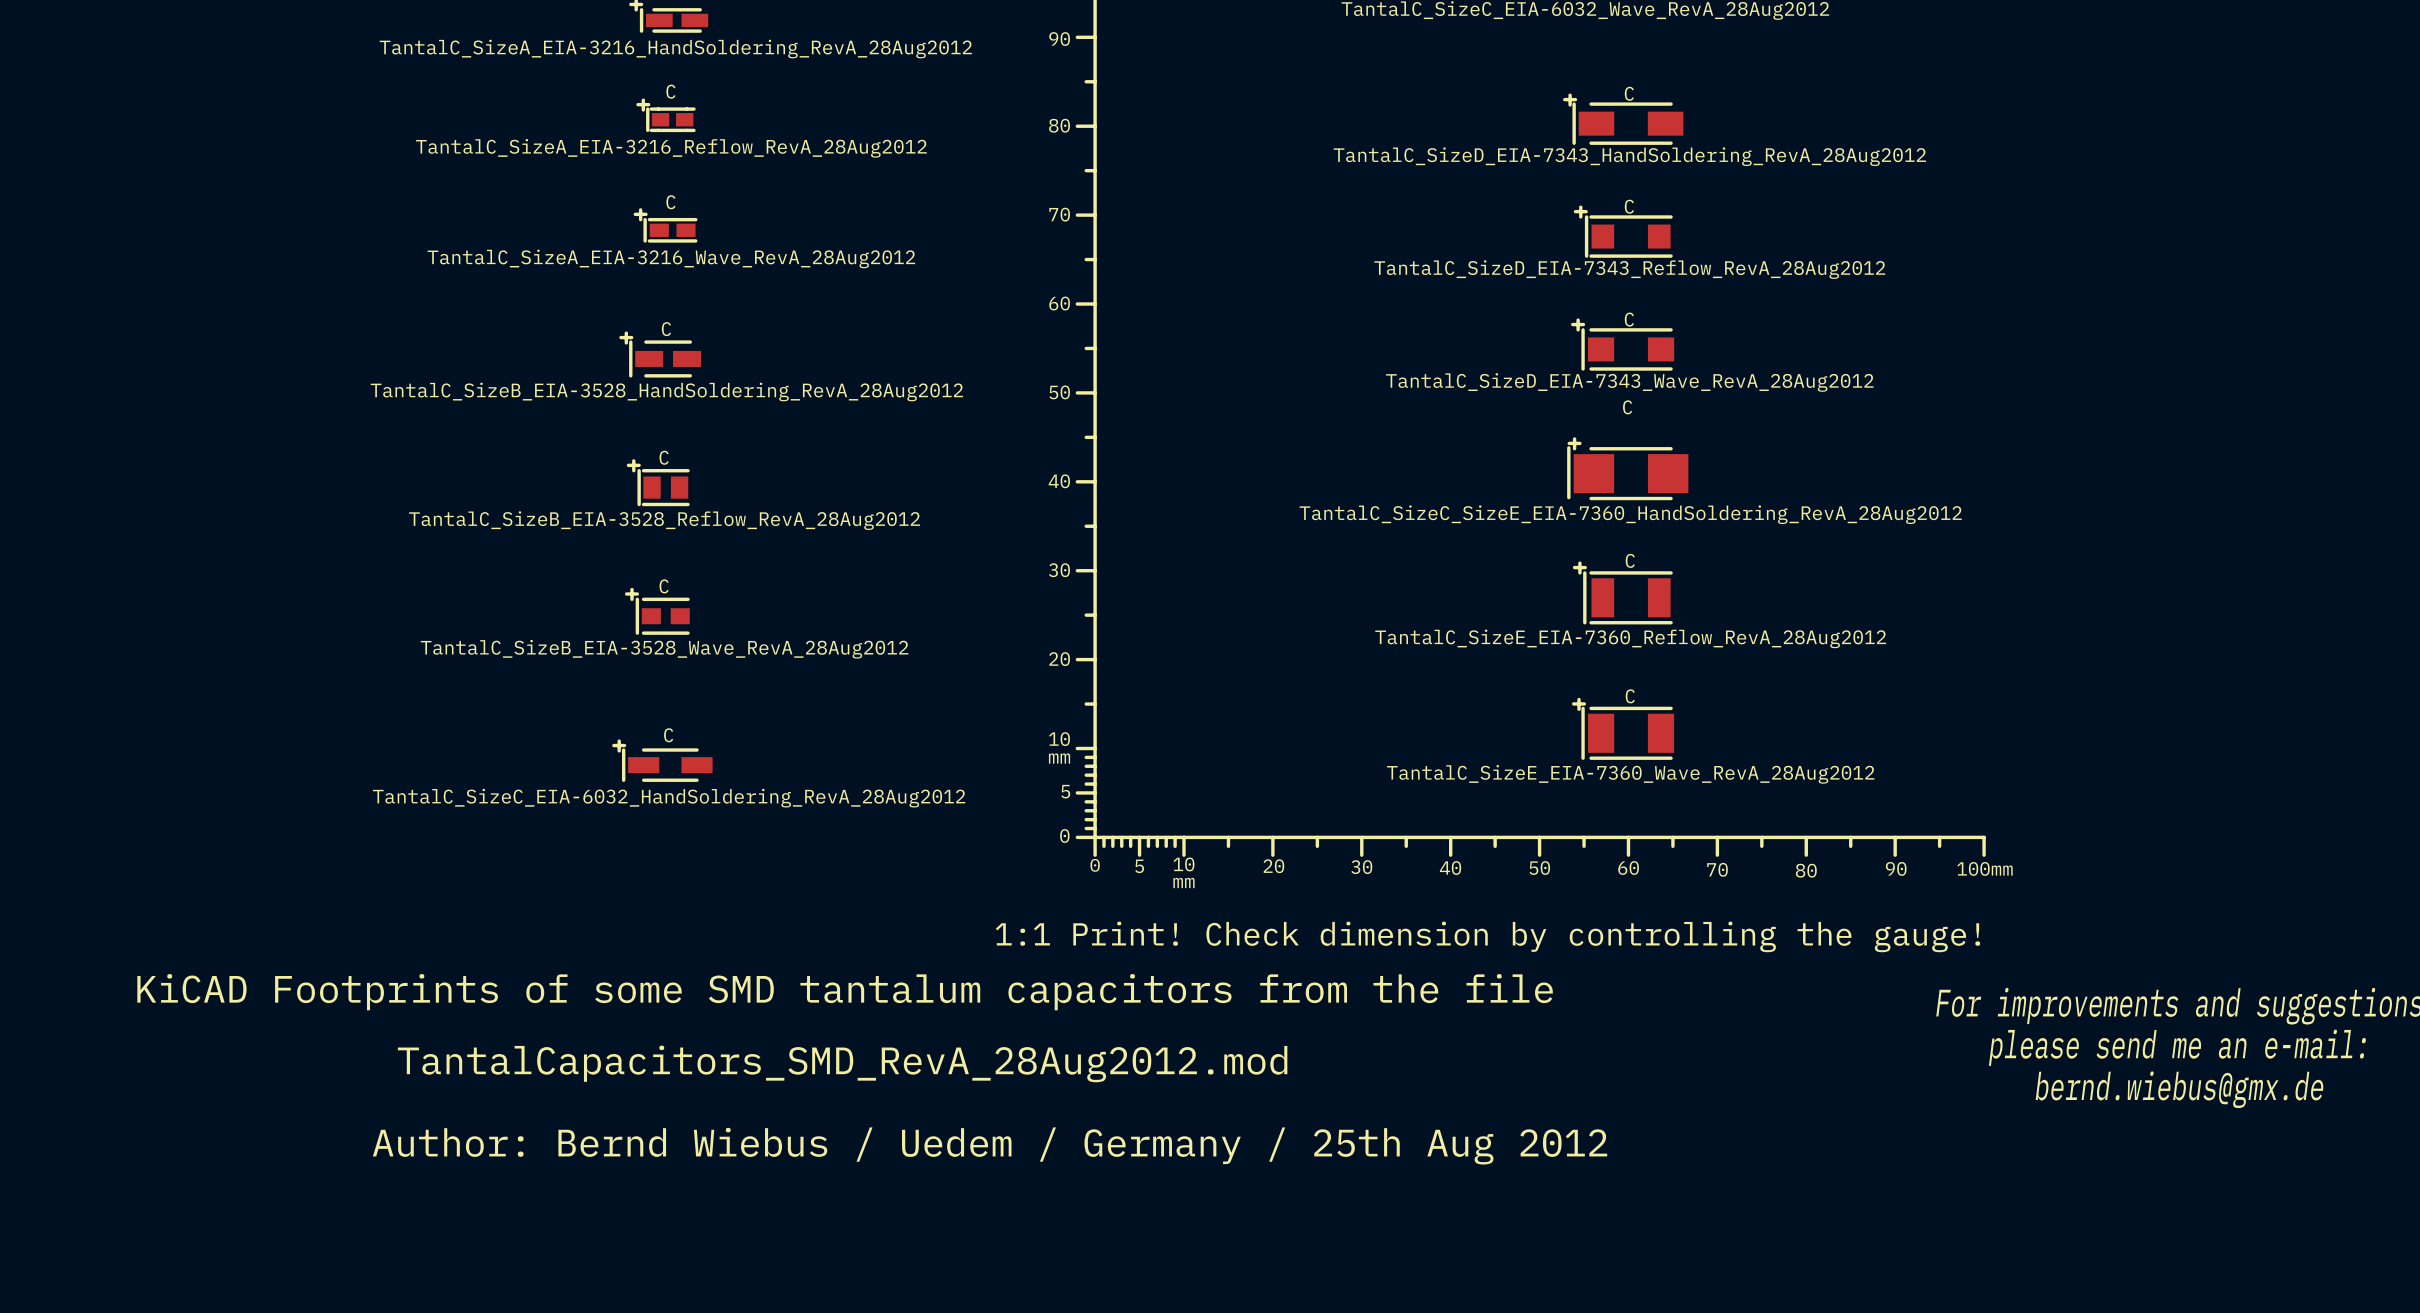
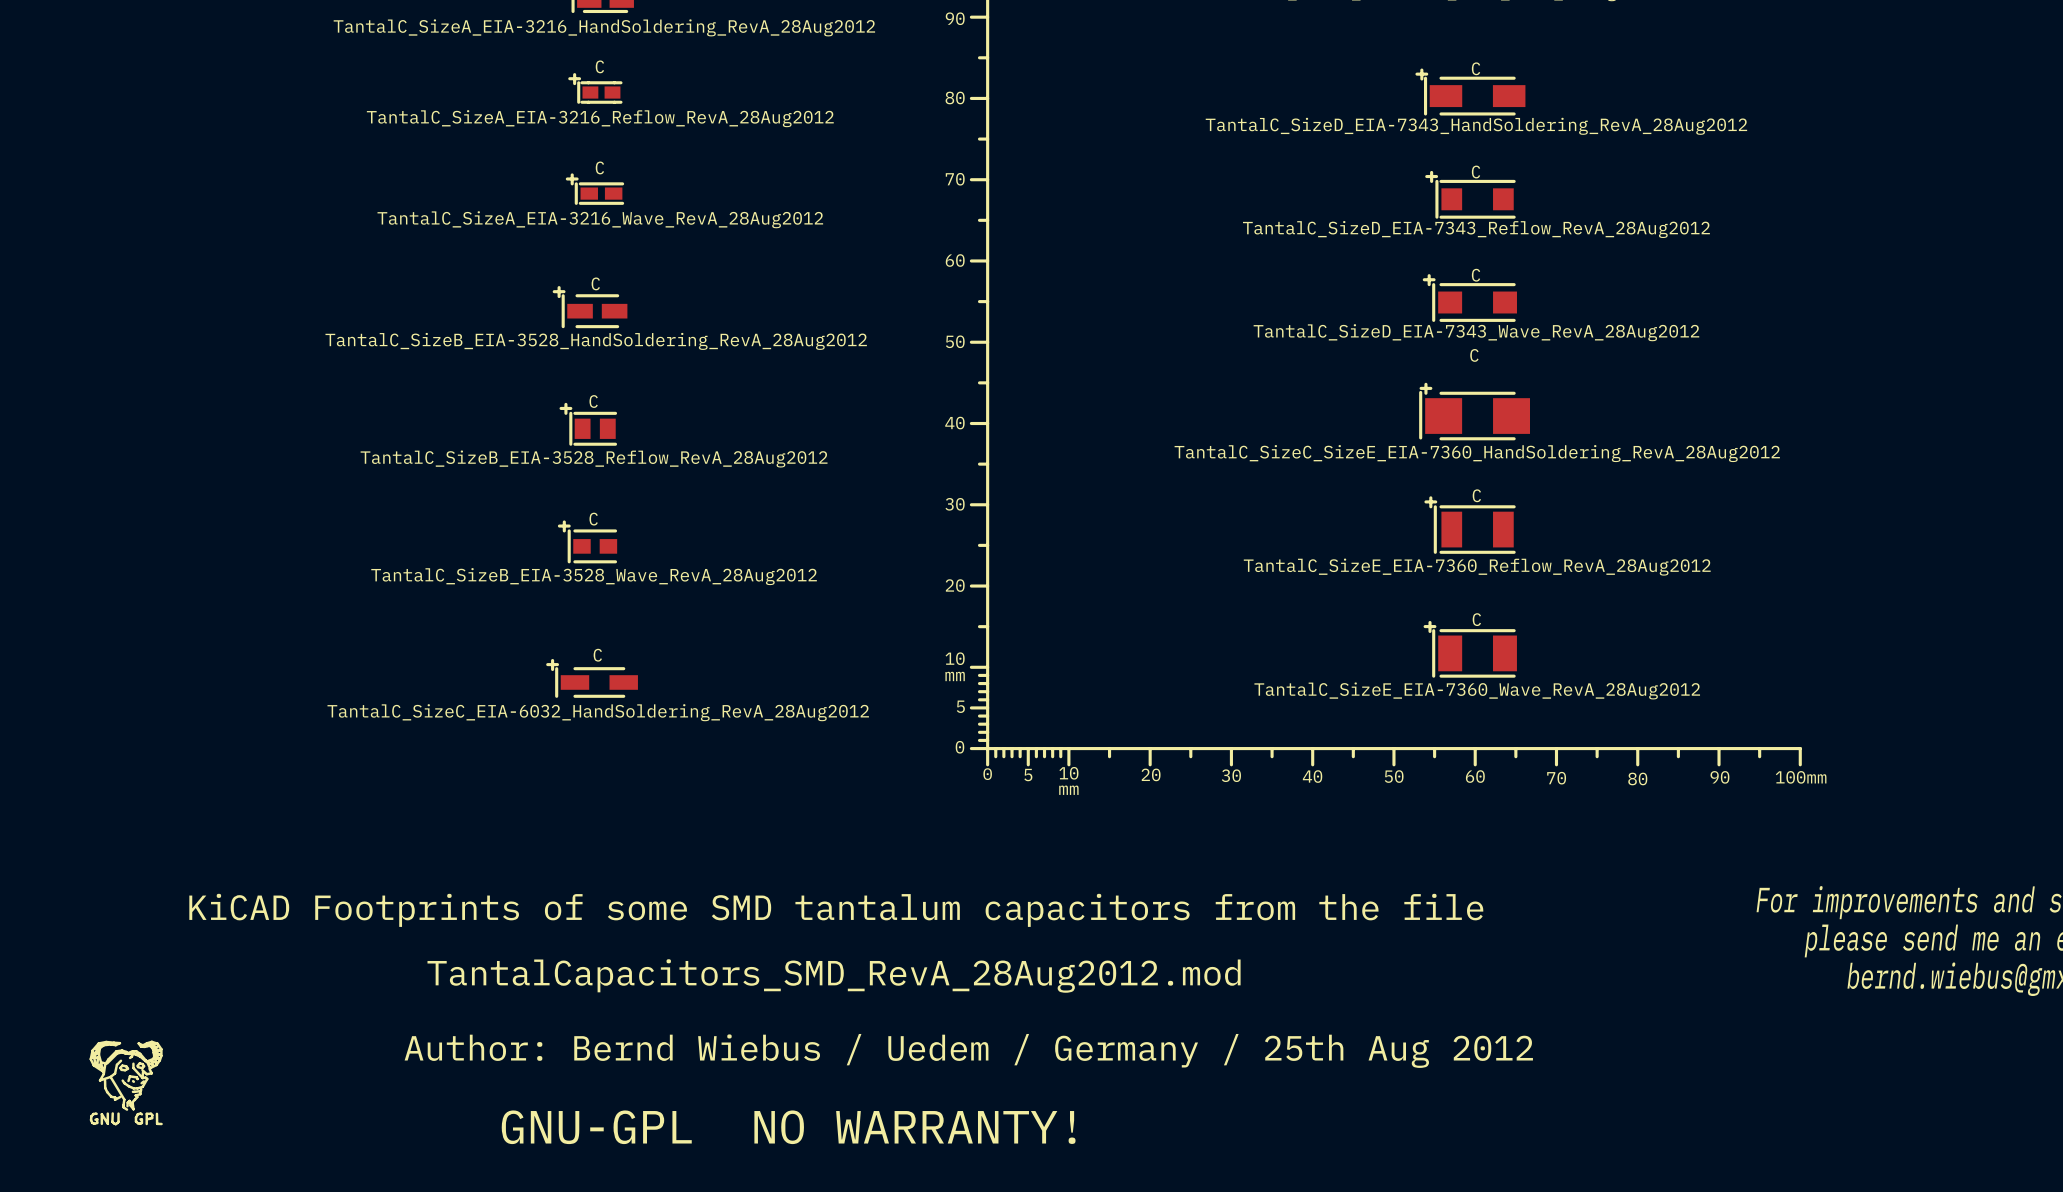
text: 1:1 Print! Check dimension by controlling the gauge! (1487, 936) -> none
text position: KiCAD Footprints of some SMD tantalum capacitors from the file (845, 992) -> KiCAD Footprints of some SMD tantalum capacitors from the file (836, 910)
text position: TantalCapacitors_SMD_RevA_28Aug2012.mod (842, 1063) -> TantalCapacitors_SMD_RevA_28Aug2012.mod (834, 975)
text position: Author: Bernd Wiebus / Uedem / Germany / 25th Aug 2012 (990, 1145) -> Author: Bernd Wiebus / Uedem / Germany / 25th Aug 2012 (968, 1050)
drawing: none -> [89, 1040, 163, 1126]
text: none -> GNU-GPL NO WARRANTY! (788, 1127)

